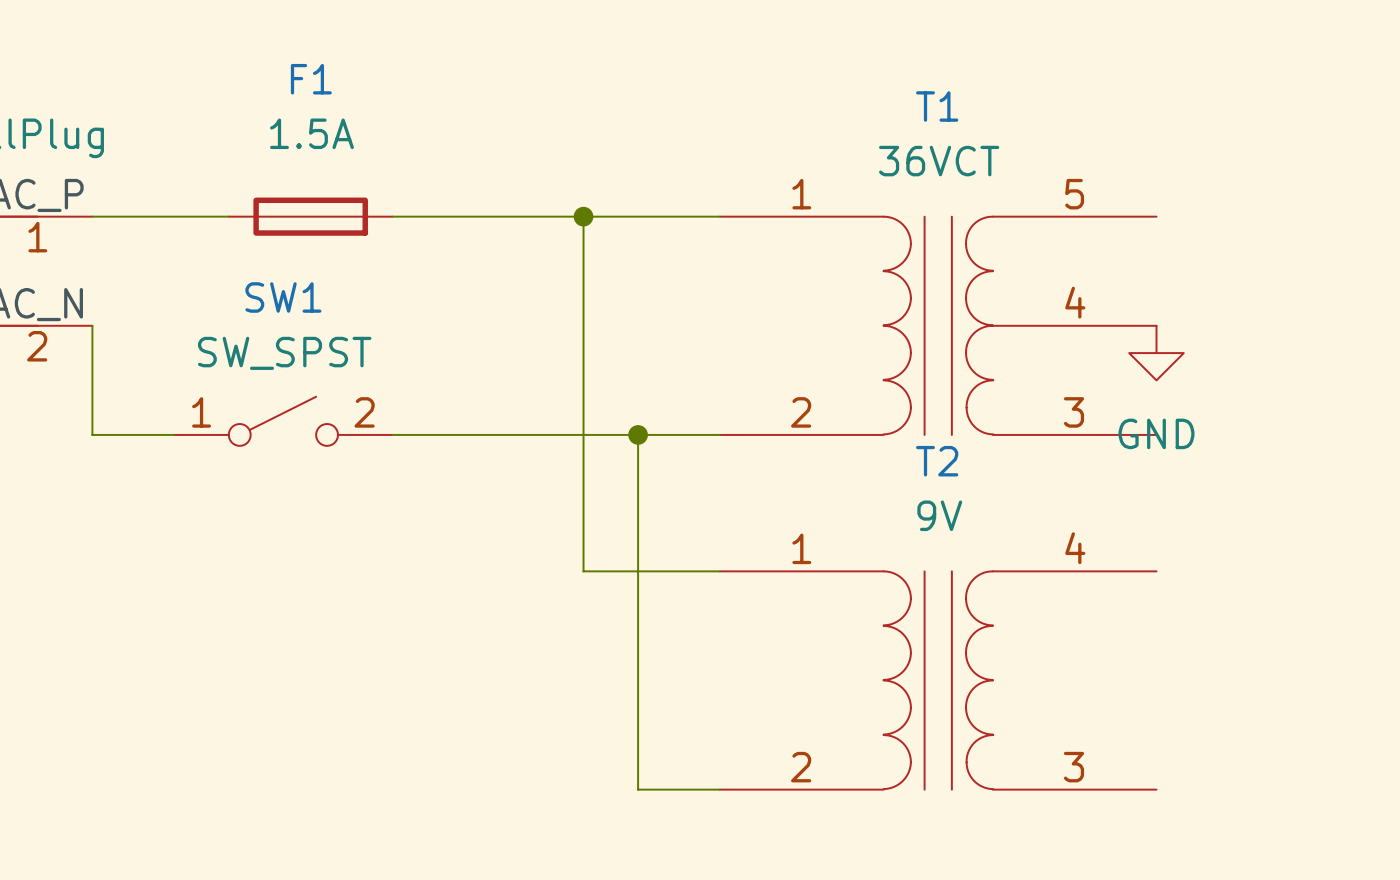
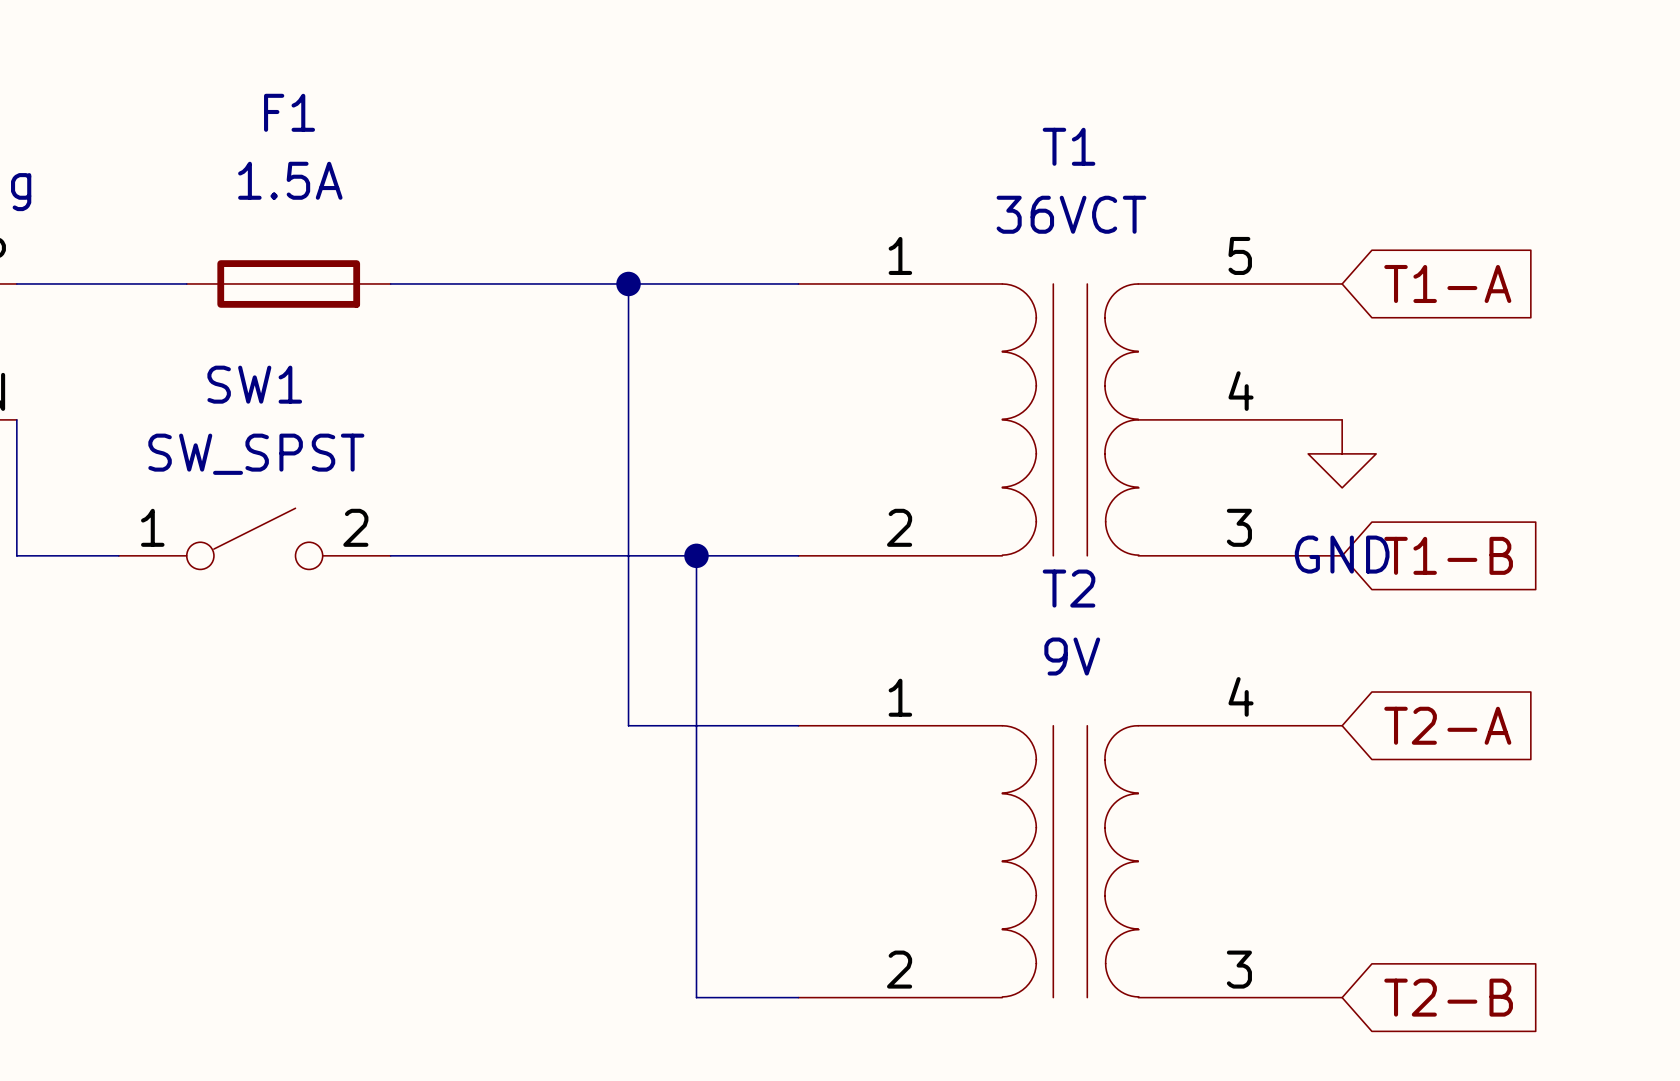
global label: none -> T1-A (1447, 283)
global label: none -> T1-B (1448, 555)
global label: none -> T2-A (1447, 725)
global label: none -> T2-B (1448, 997)

